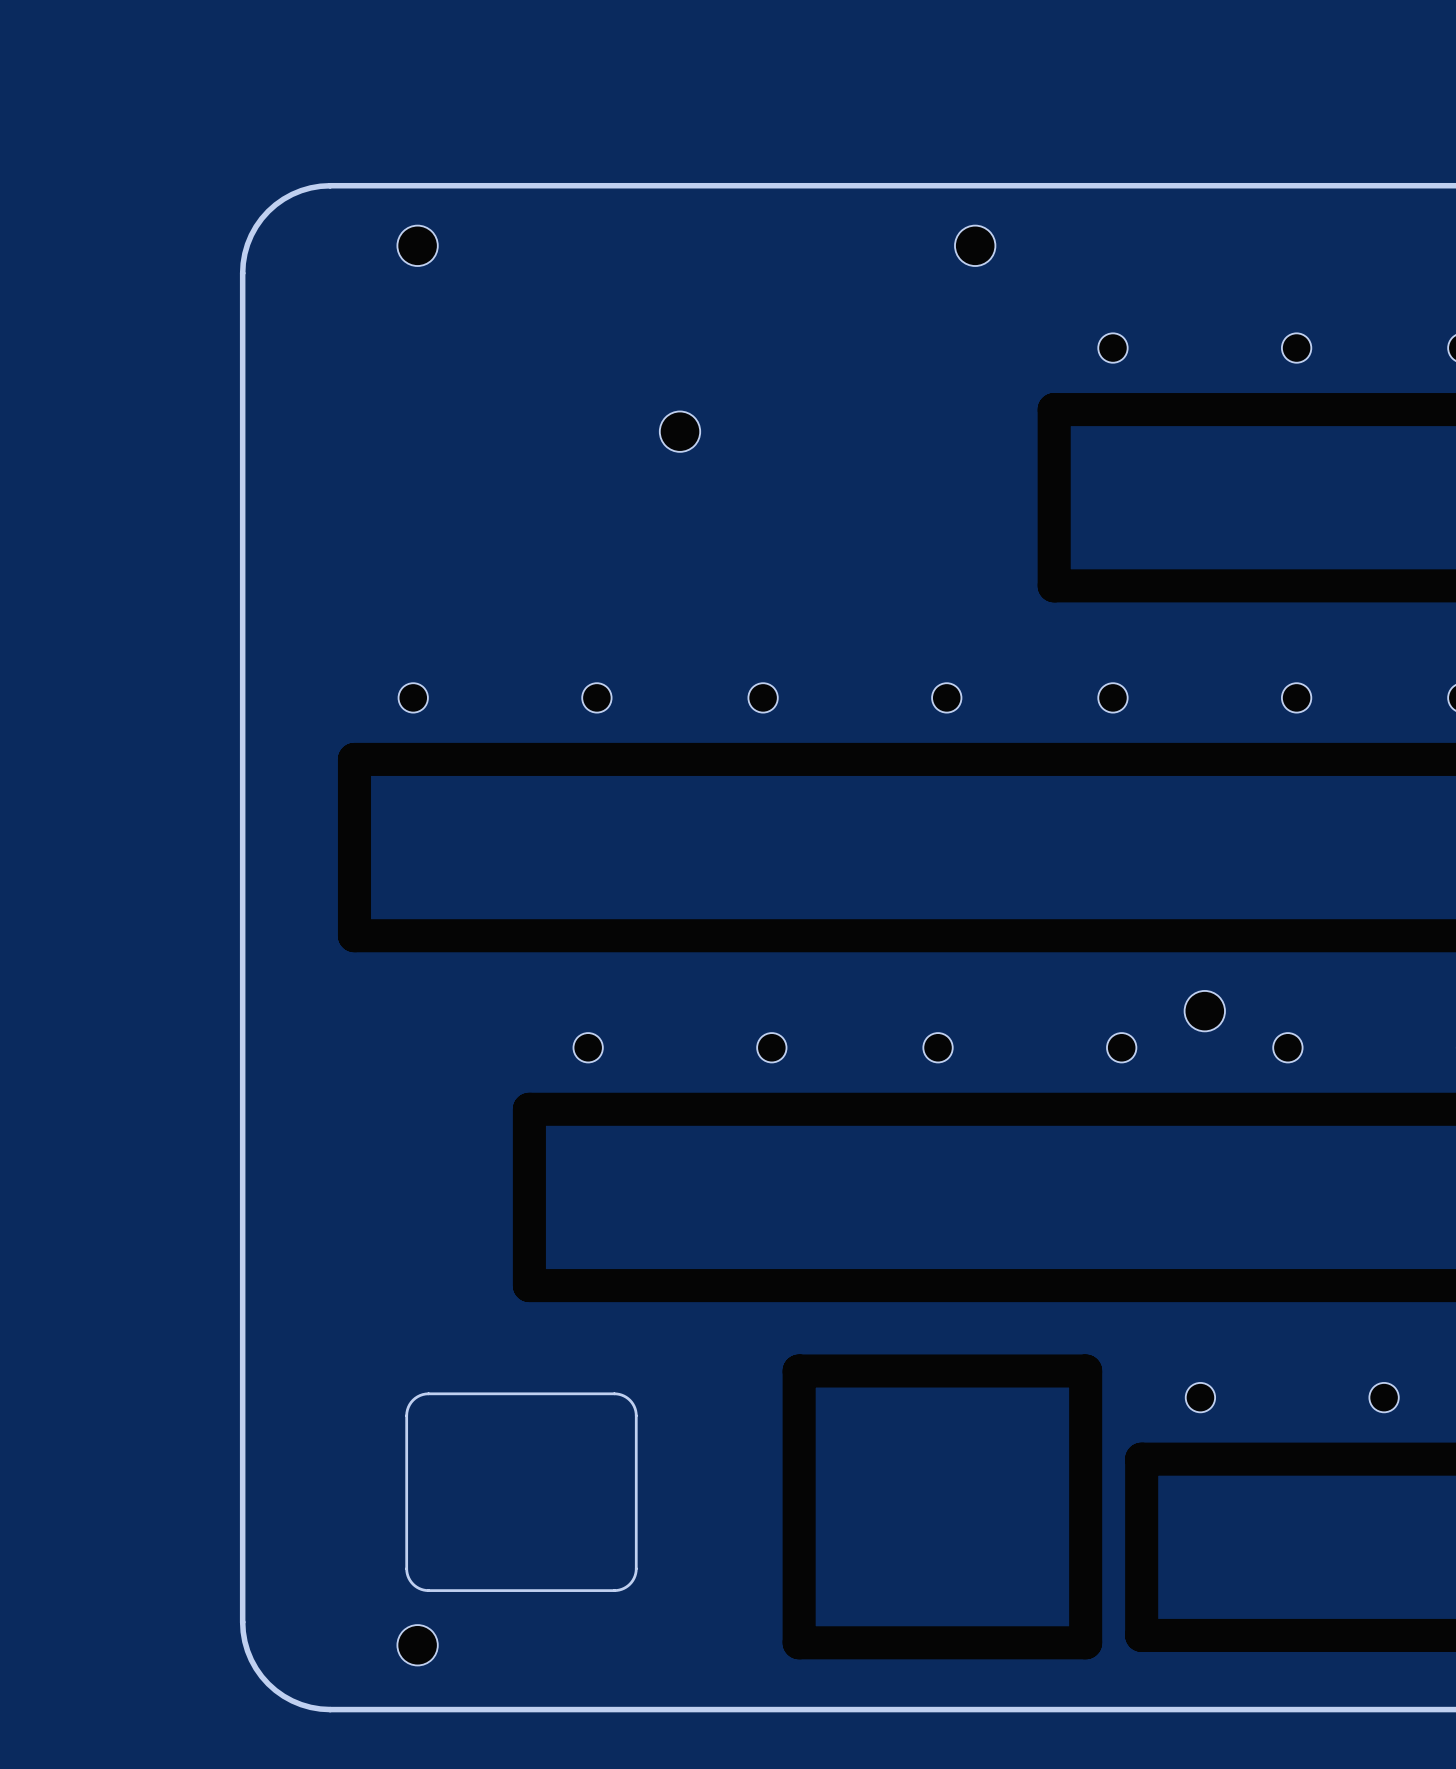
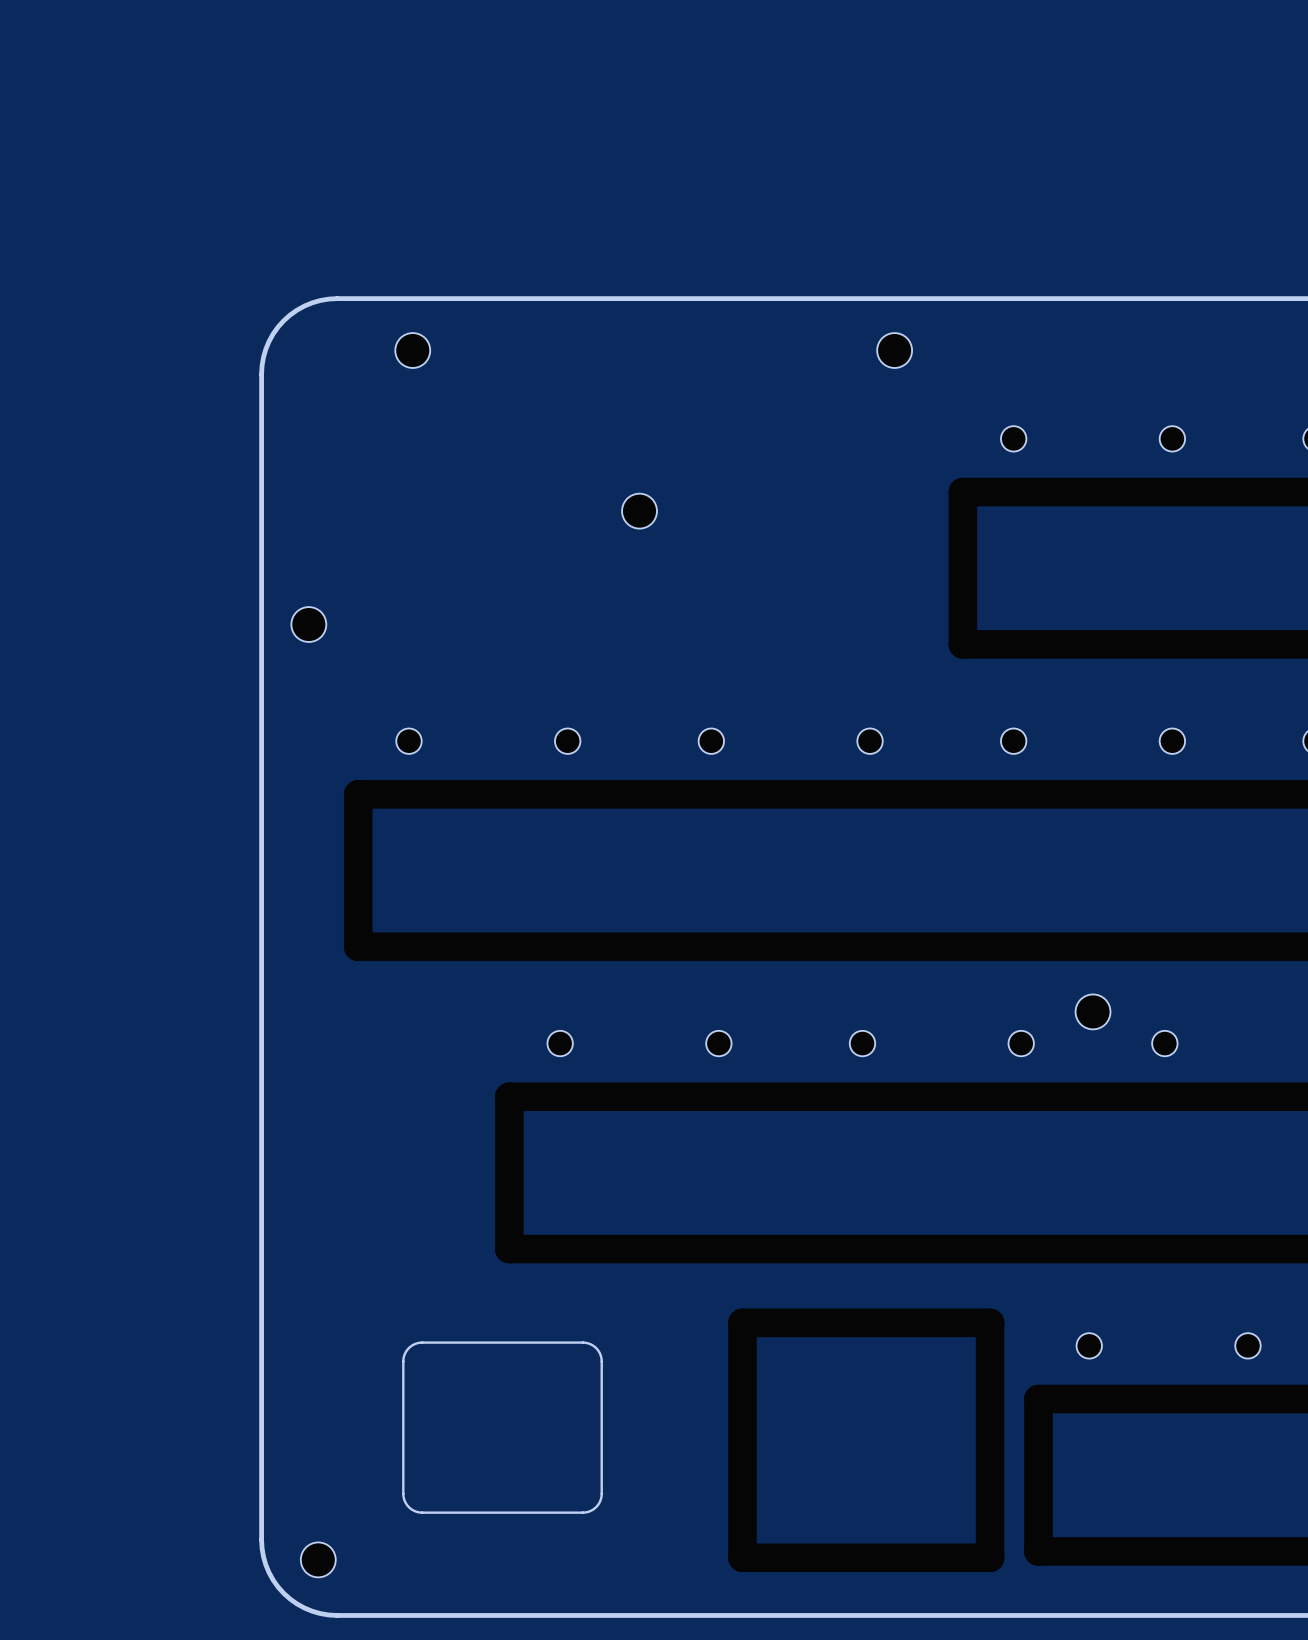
part: none -> (308, 624)
part position: (417, 1645) -> (318, 1559)

